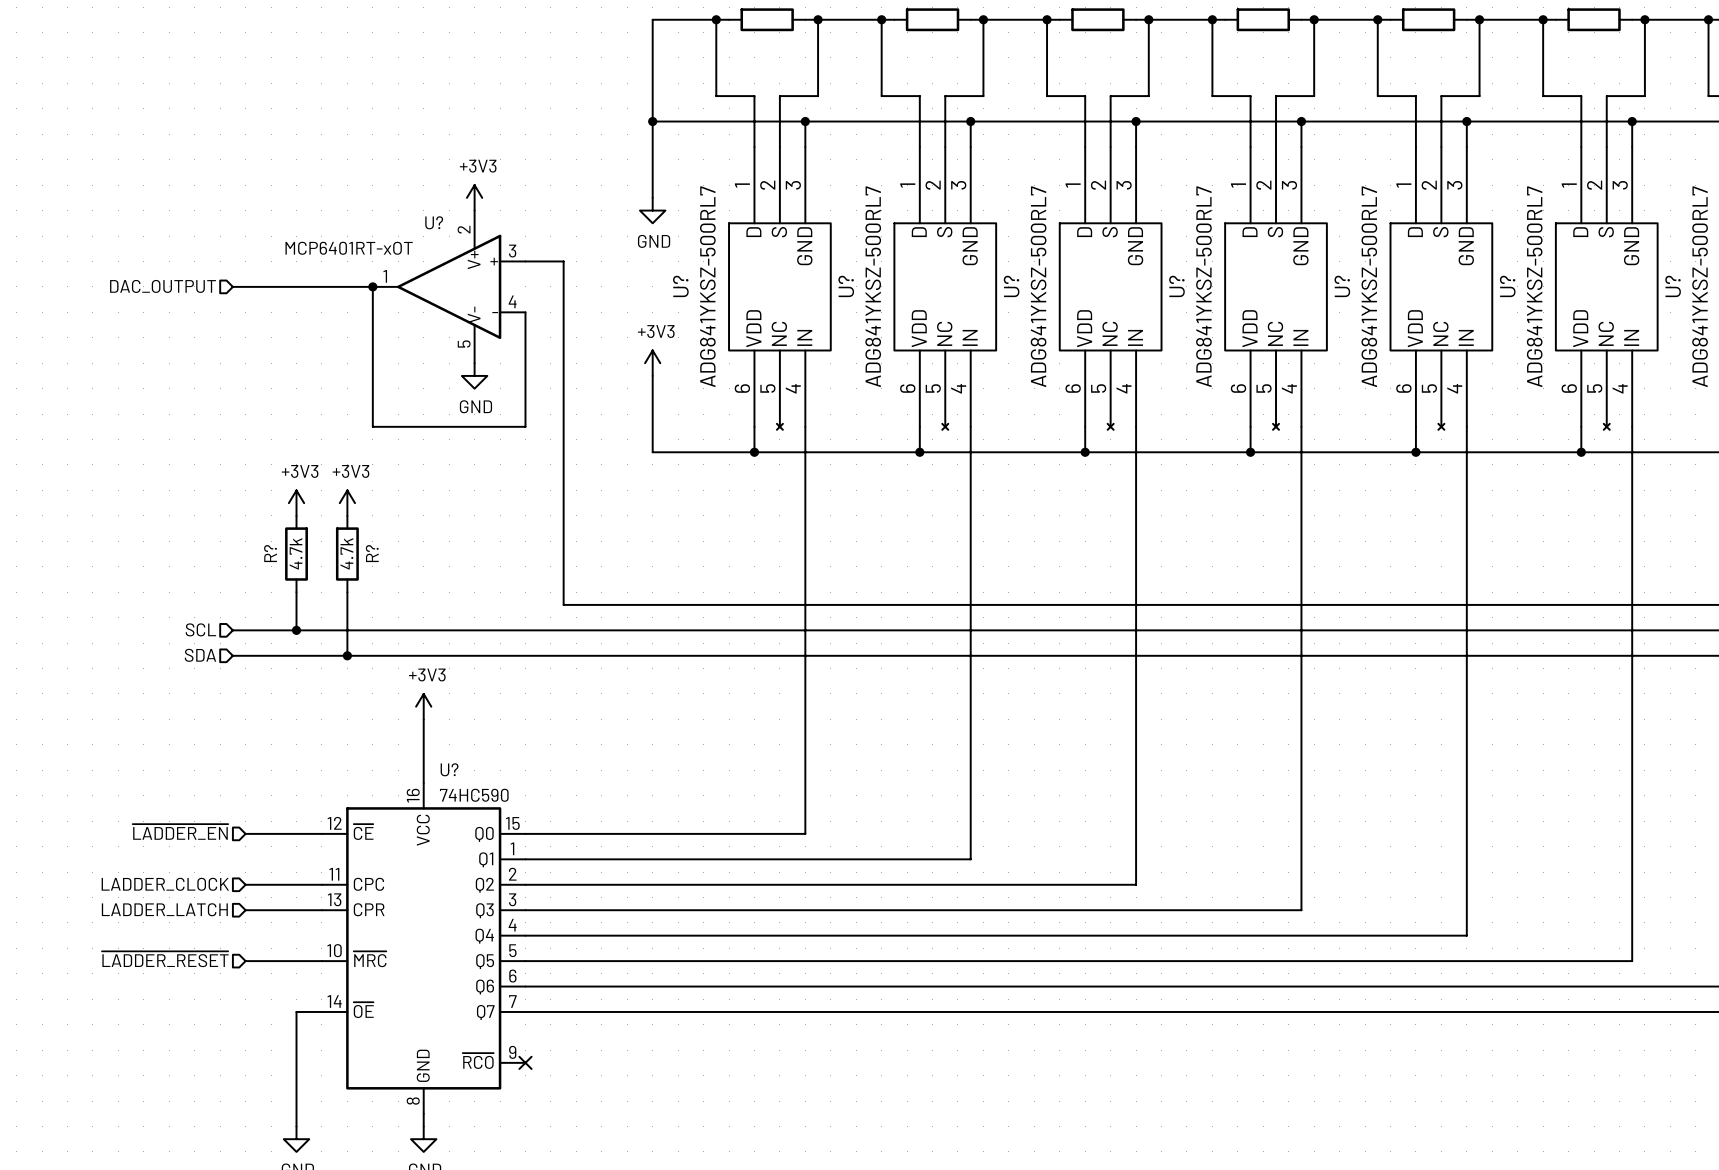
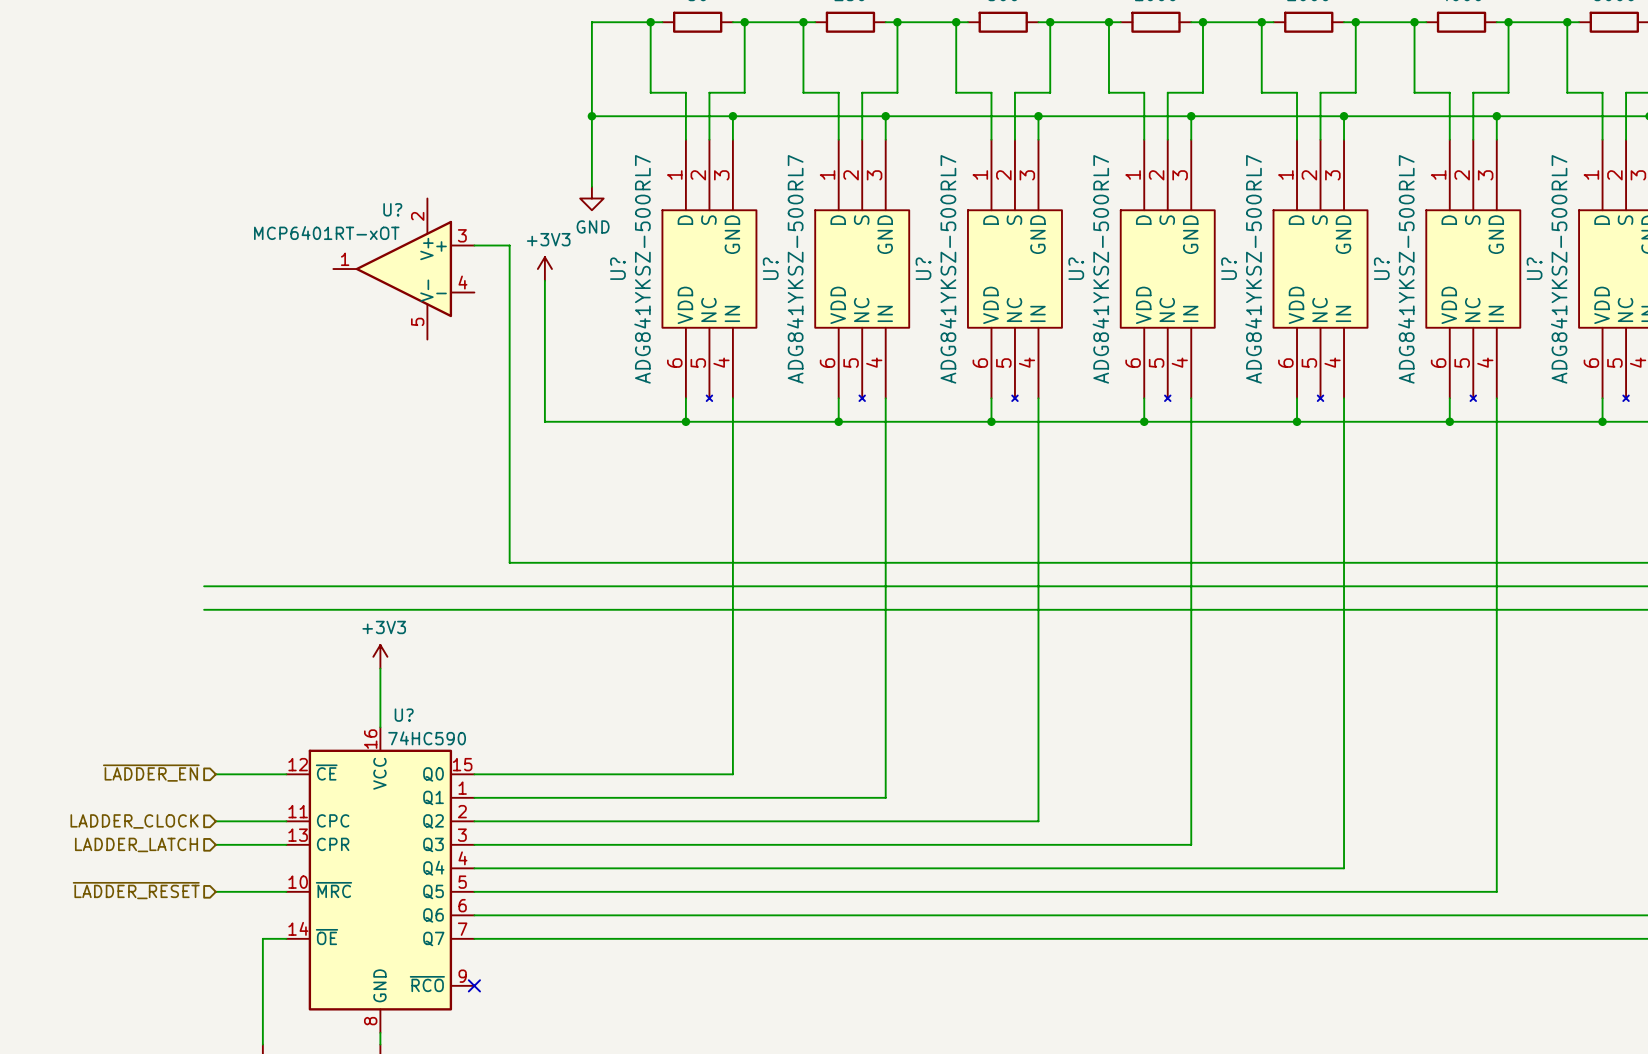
power symbol: +3V3 (474, 197) -> none
hierarchical label: DAC_OUTPUT (163, 286) -> none
wire: (232, 286) (372, 286) (372, 426) (525, 426) (525, 312) -> none
junction: (372, 286) -> none
power symbol: none -> +3V3 (544, 269)
power symbol: +3V3 (652, 363) -> none
power symbol: GND (474, 375) -> none
wire: (652, 375) (652, 452) -> (544, 280) (544, 421) (591, 421)
power symbol: +3V3 (296, 503) -> none
power symbol: +3V3 (347, 503) -> none
R?: 4.7k (296, 554) -> none
R?: 4.7k (347, 554) -> none
wire: (296, 592) (296, 630) -> none
wire: (347, 592) (347, 655) -> none
hierarchical label: SCL (200, 629) -> none
junction: (296, 630) -> none
hierarchical label: SDA (200, 655) -> none
junction: (347, 655) -> none

